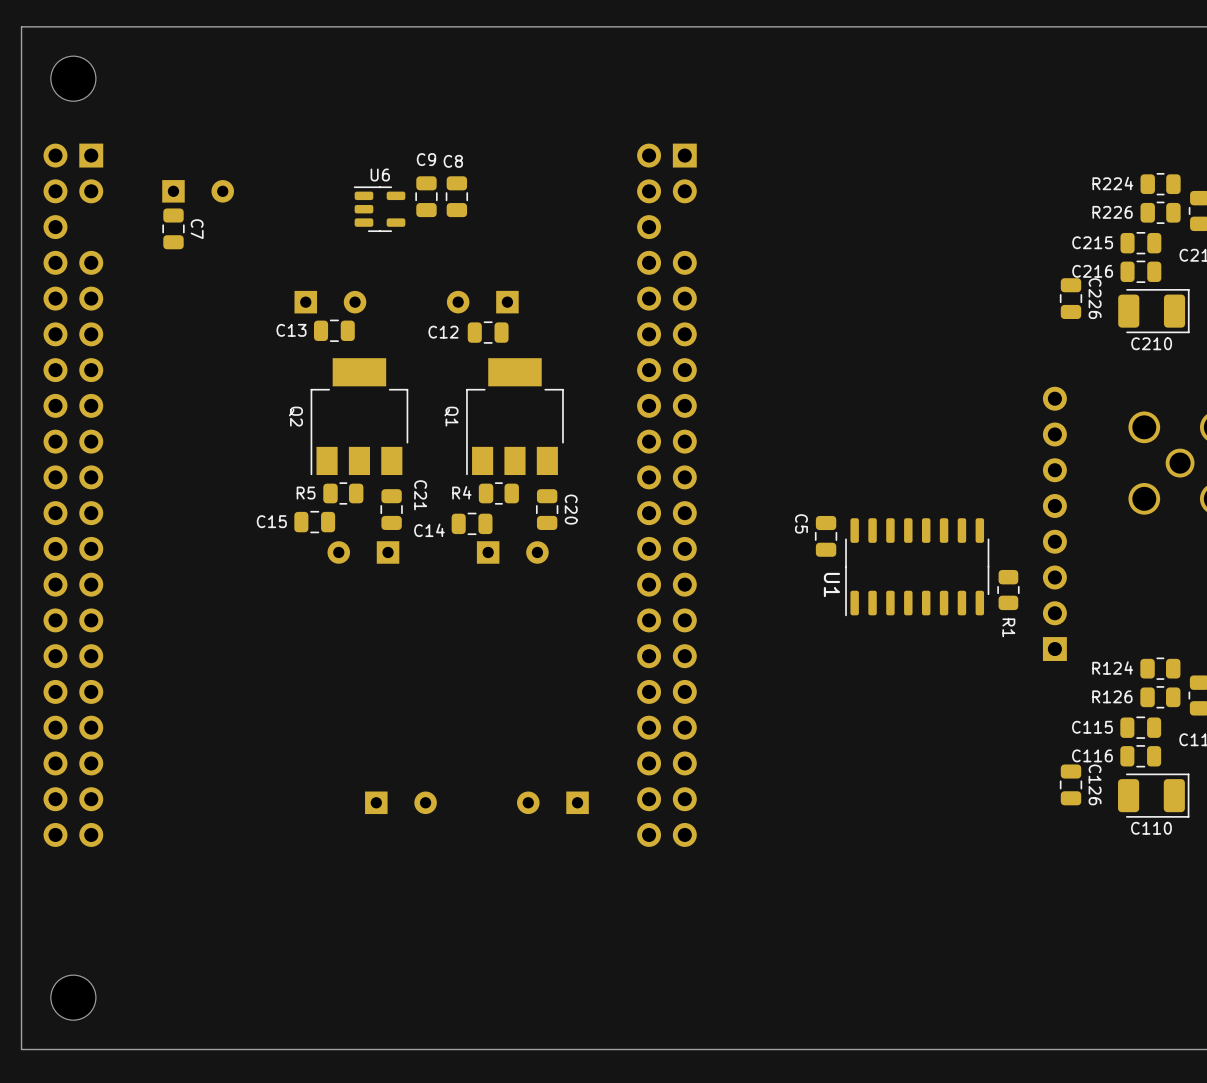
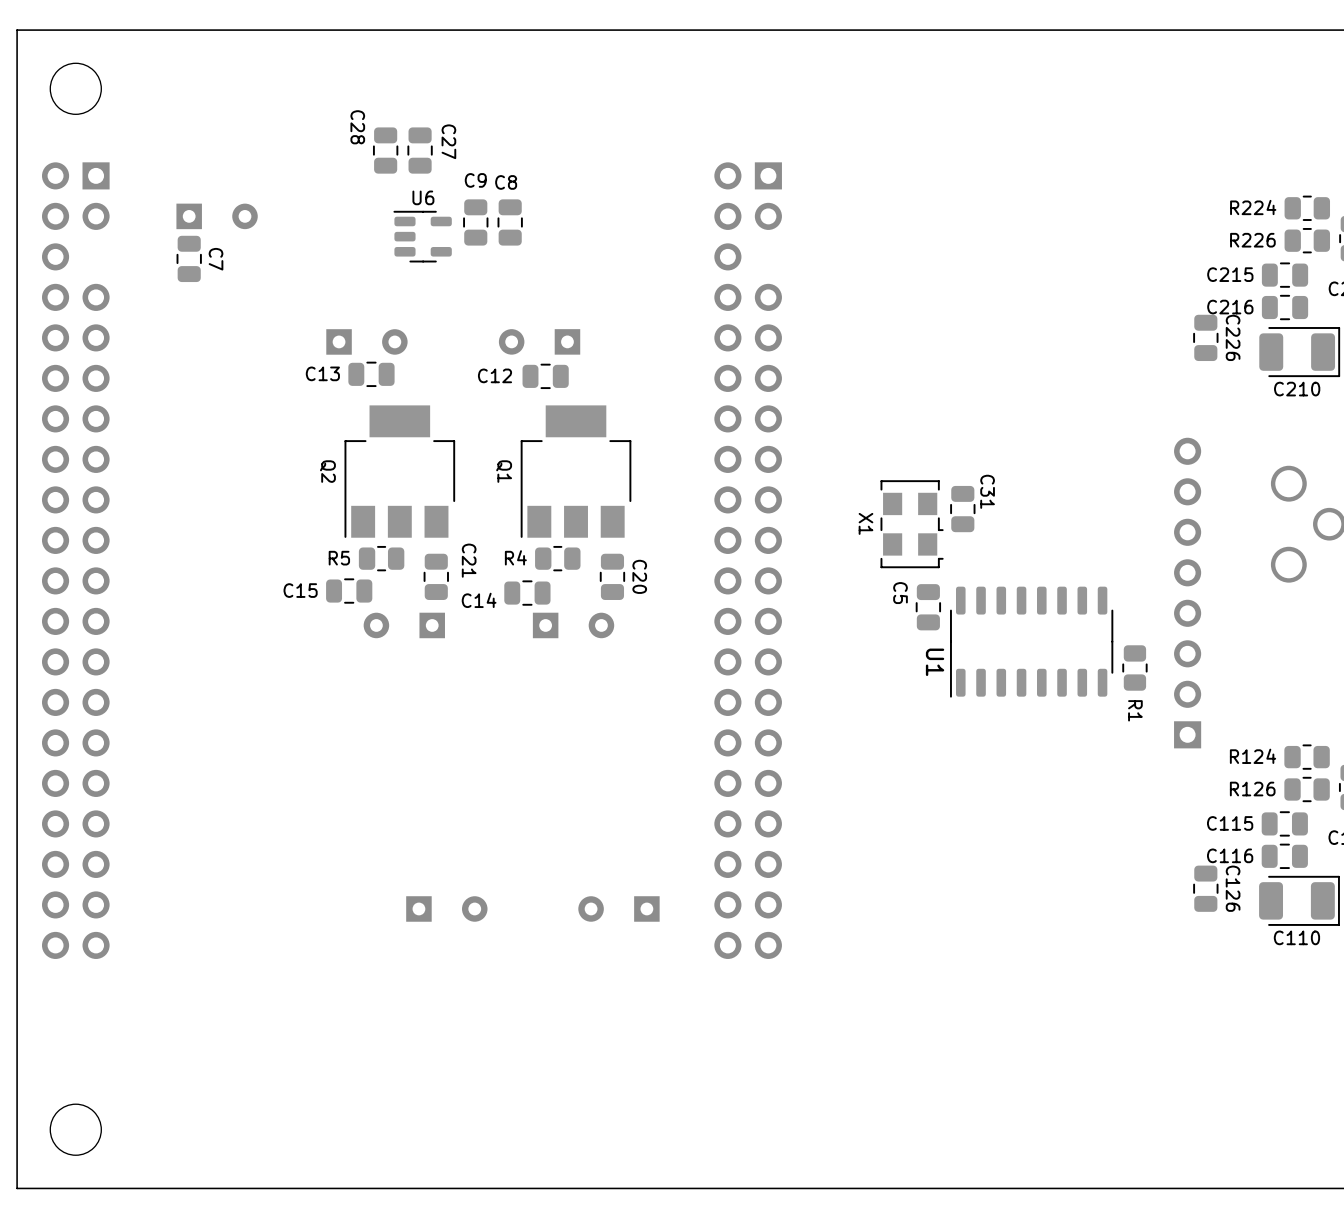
C28: none -> (385, 150)
C27: none -> (420, 150)
C31: none -> (962, 509)
X1: none -> (912, 524)

